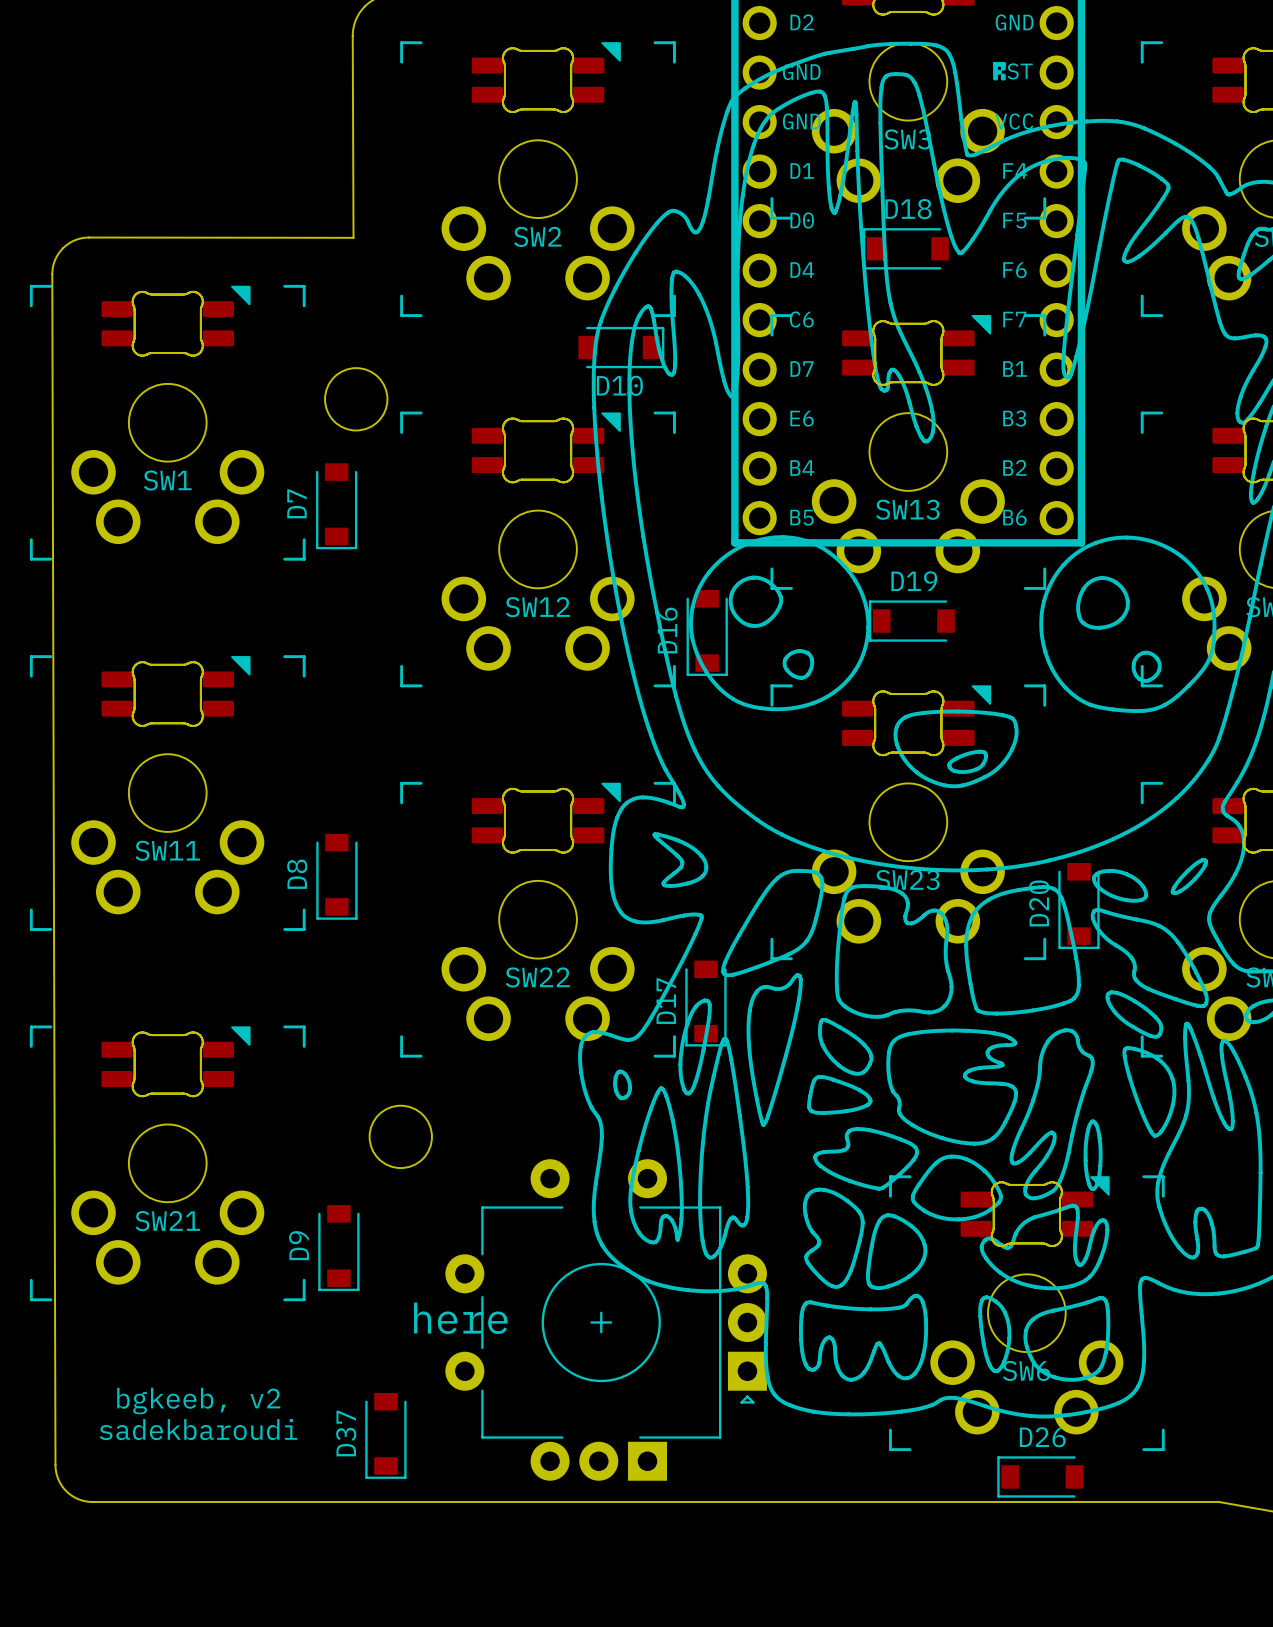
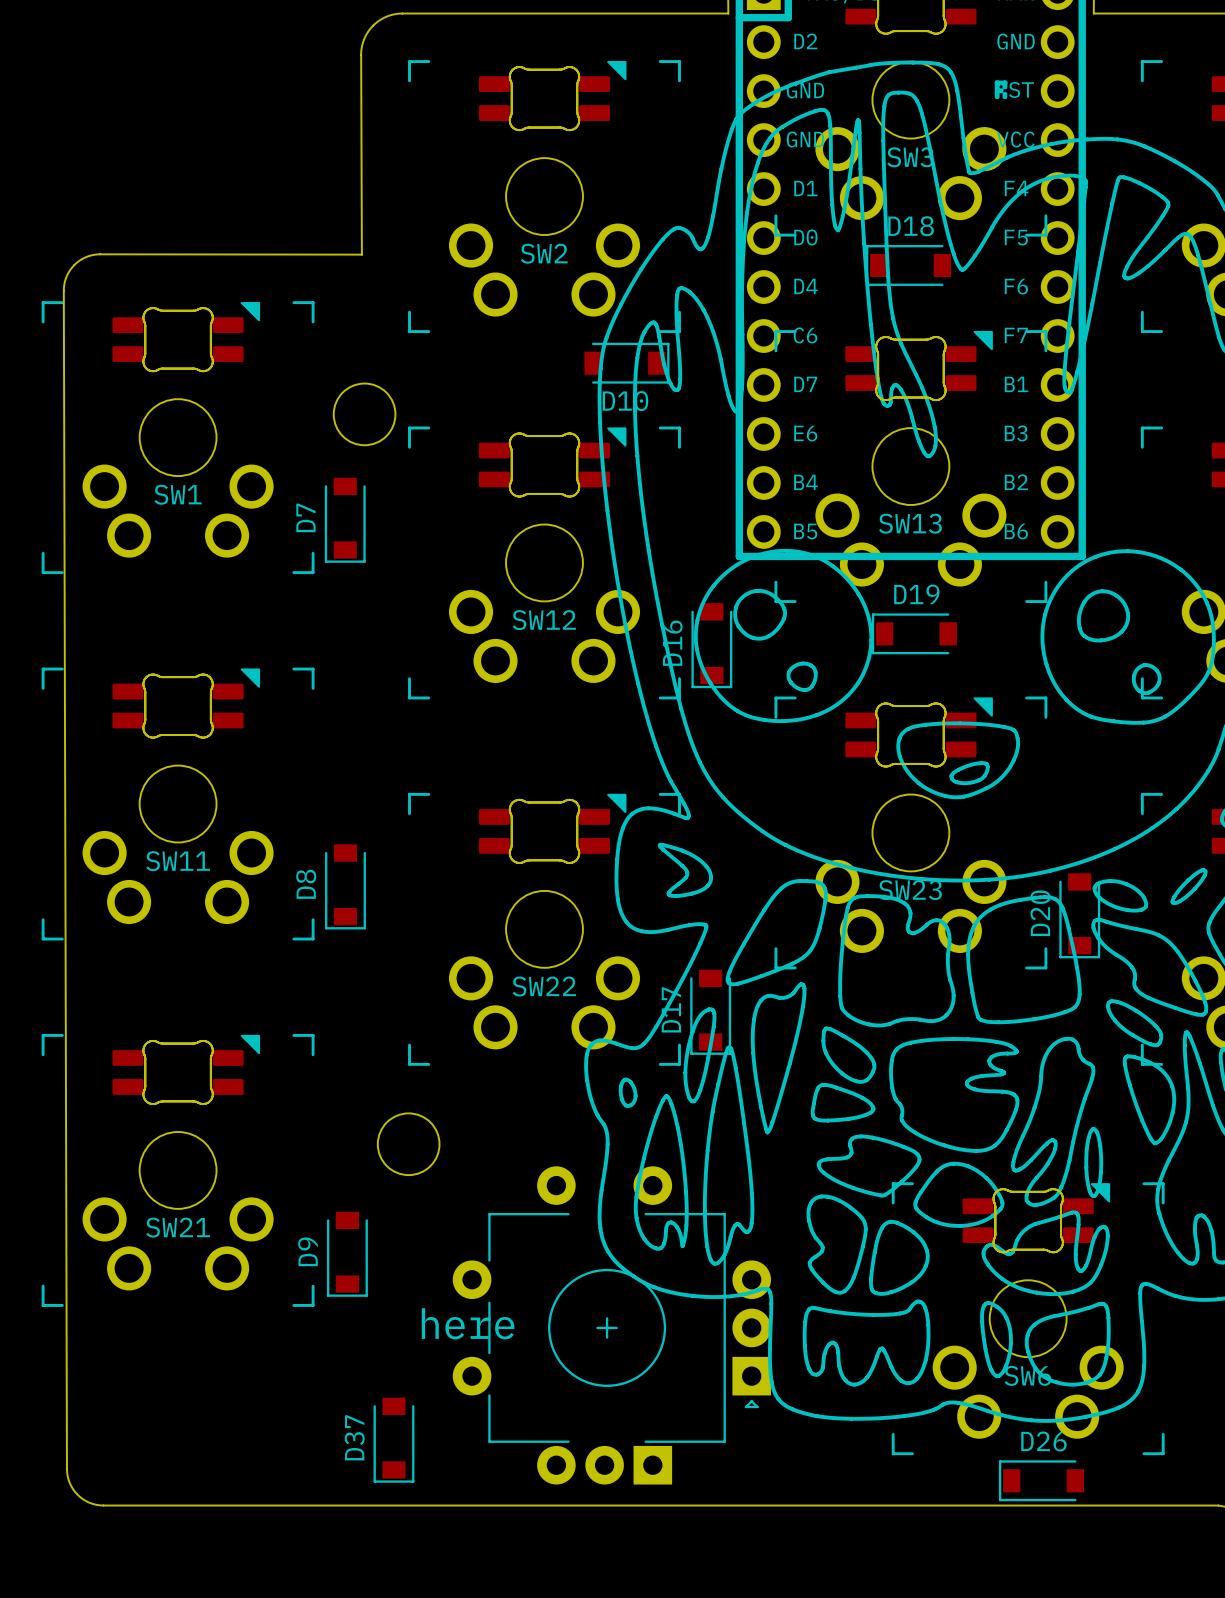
text: bgkeeb, v2 (198, 1401) -> none
text: sadekbaroudi (198, 1429) -> none

